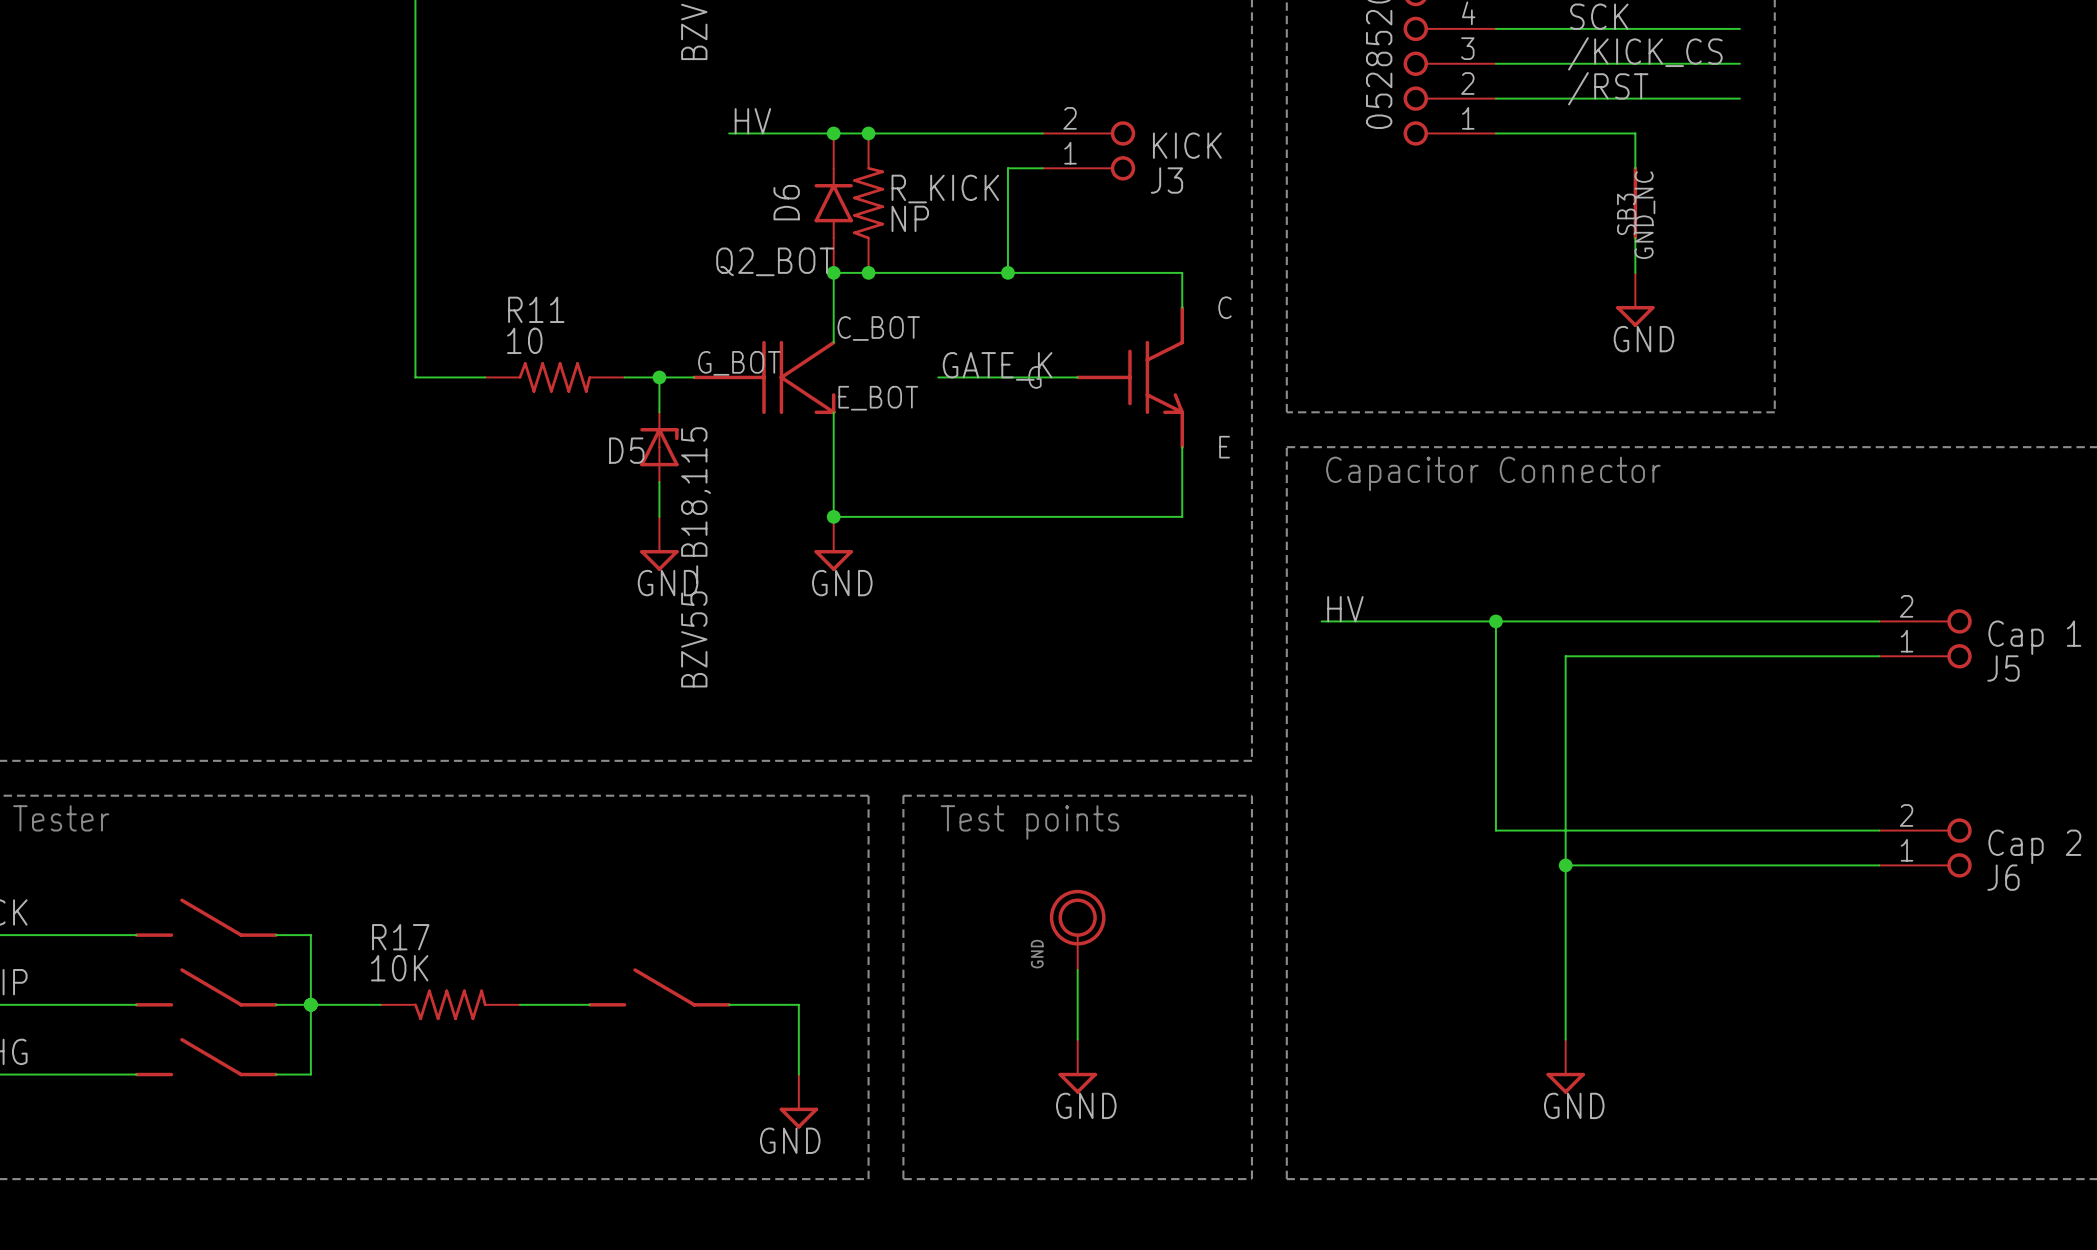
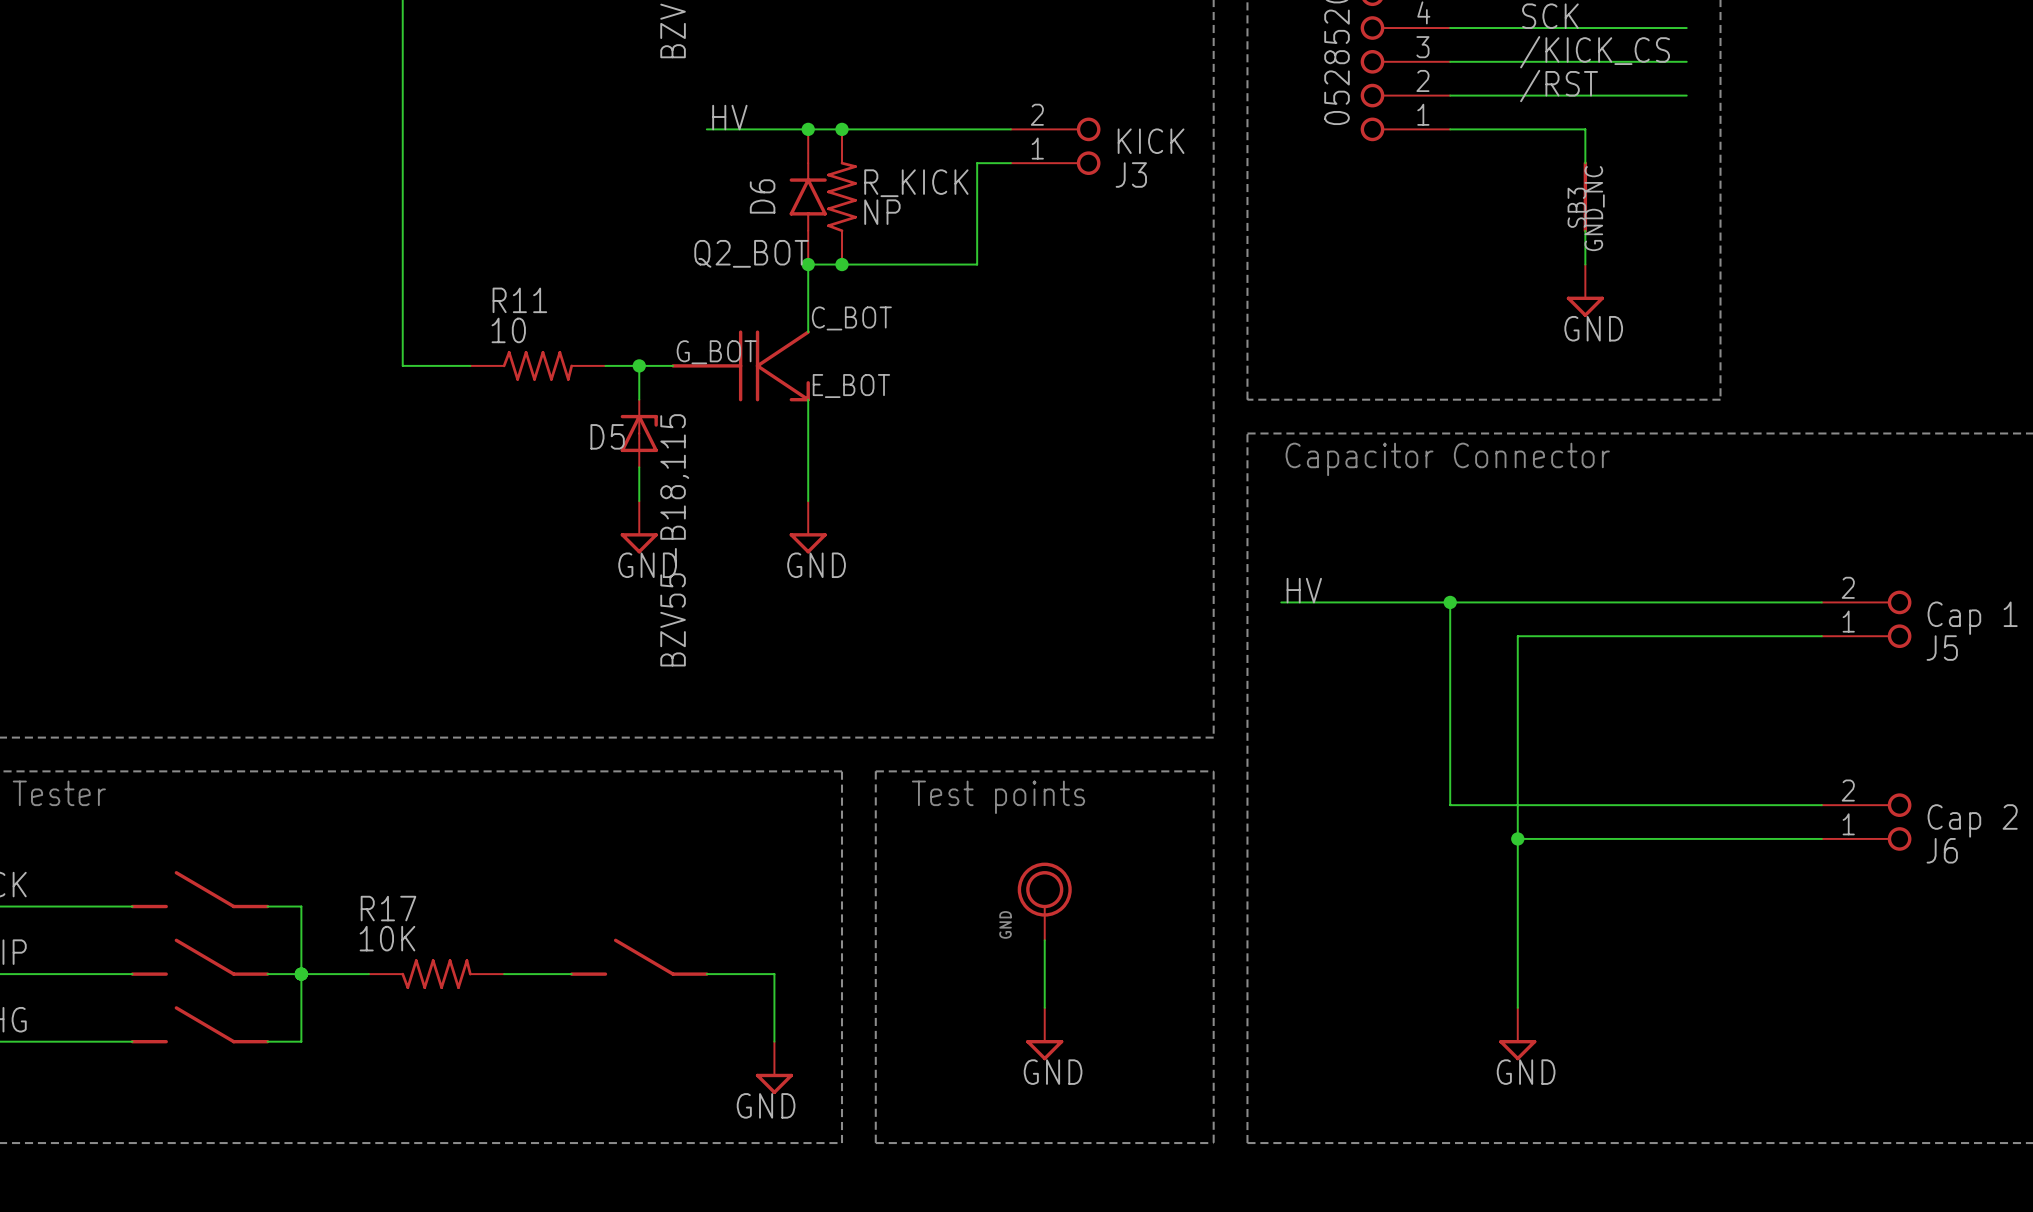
wire: (1007, 272) (1182, 272) (1182, 307) -> none
junction: (1007, 272) -> none
label: GATE_K (997, 366) -> none
wire: (938, 377) (1077, 377) -> none
part: (1129, 377) -> none
wire: (1182, 447) (1182, 516) (833, 516) -> none
junction: (833, 516) -> none

